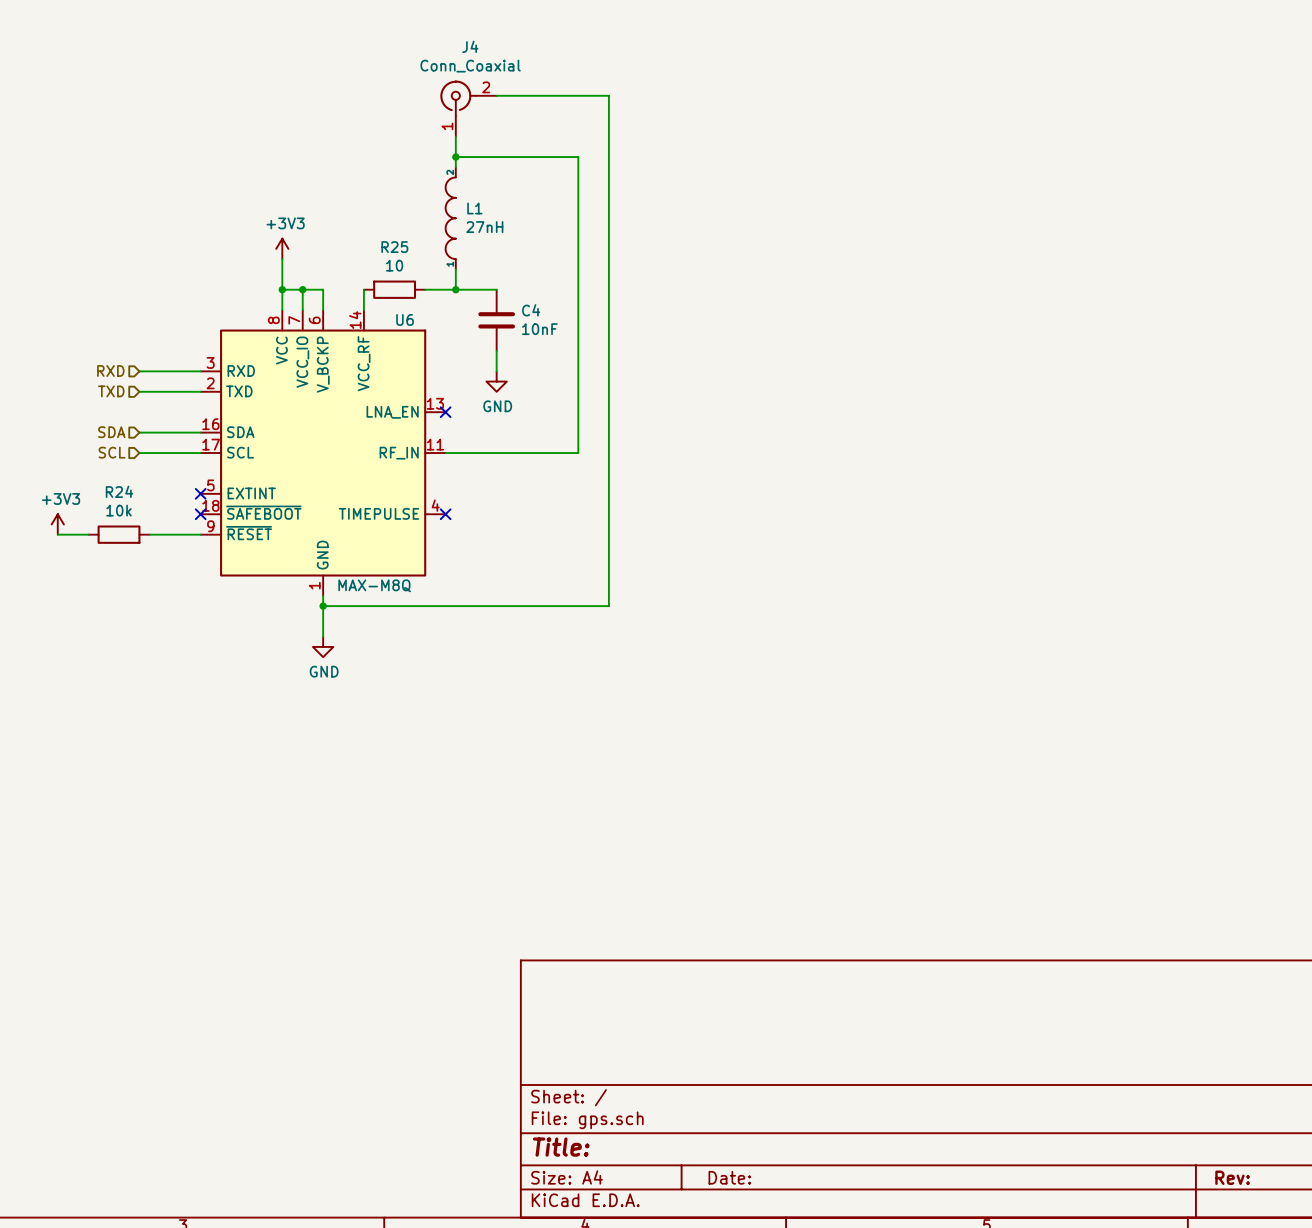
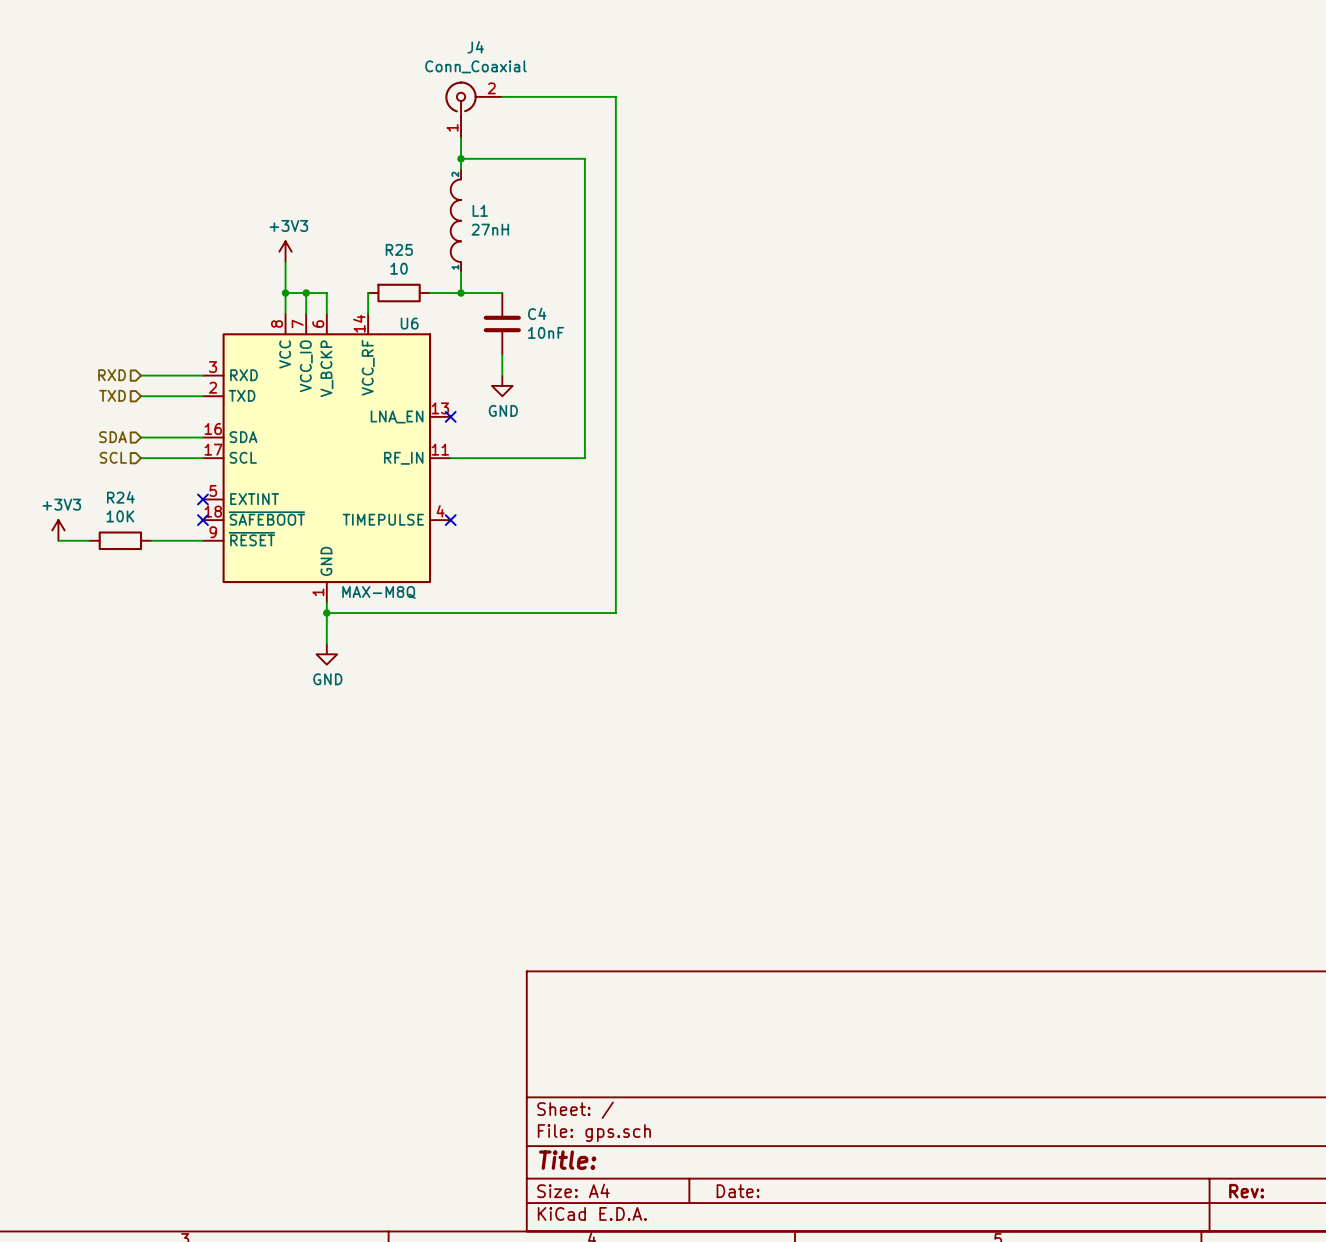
R24 value: 10k (119, 510) -> 10K (120, 516)

